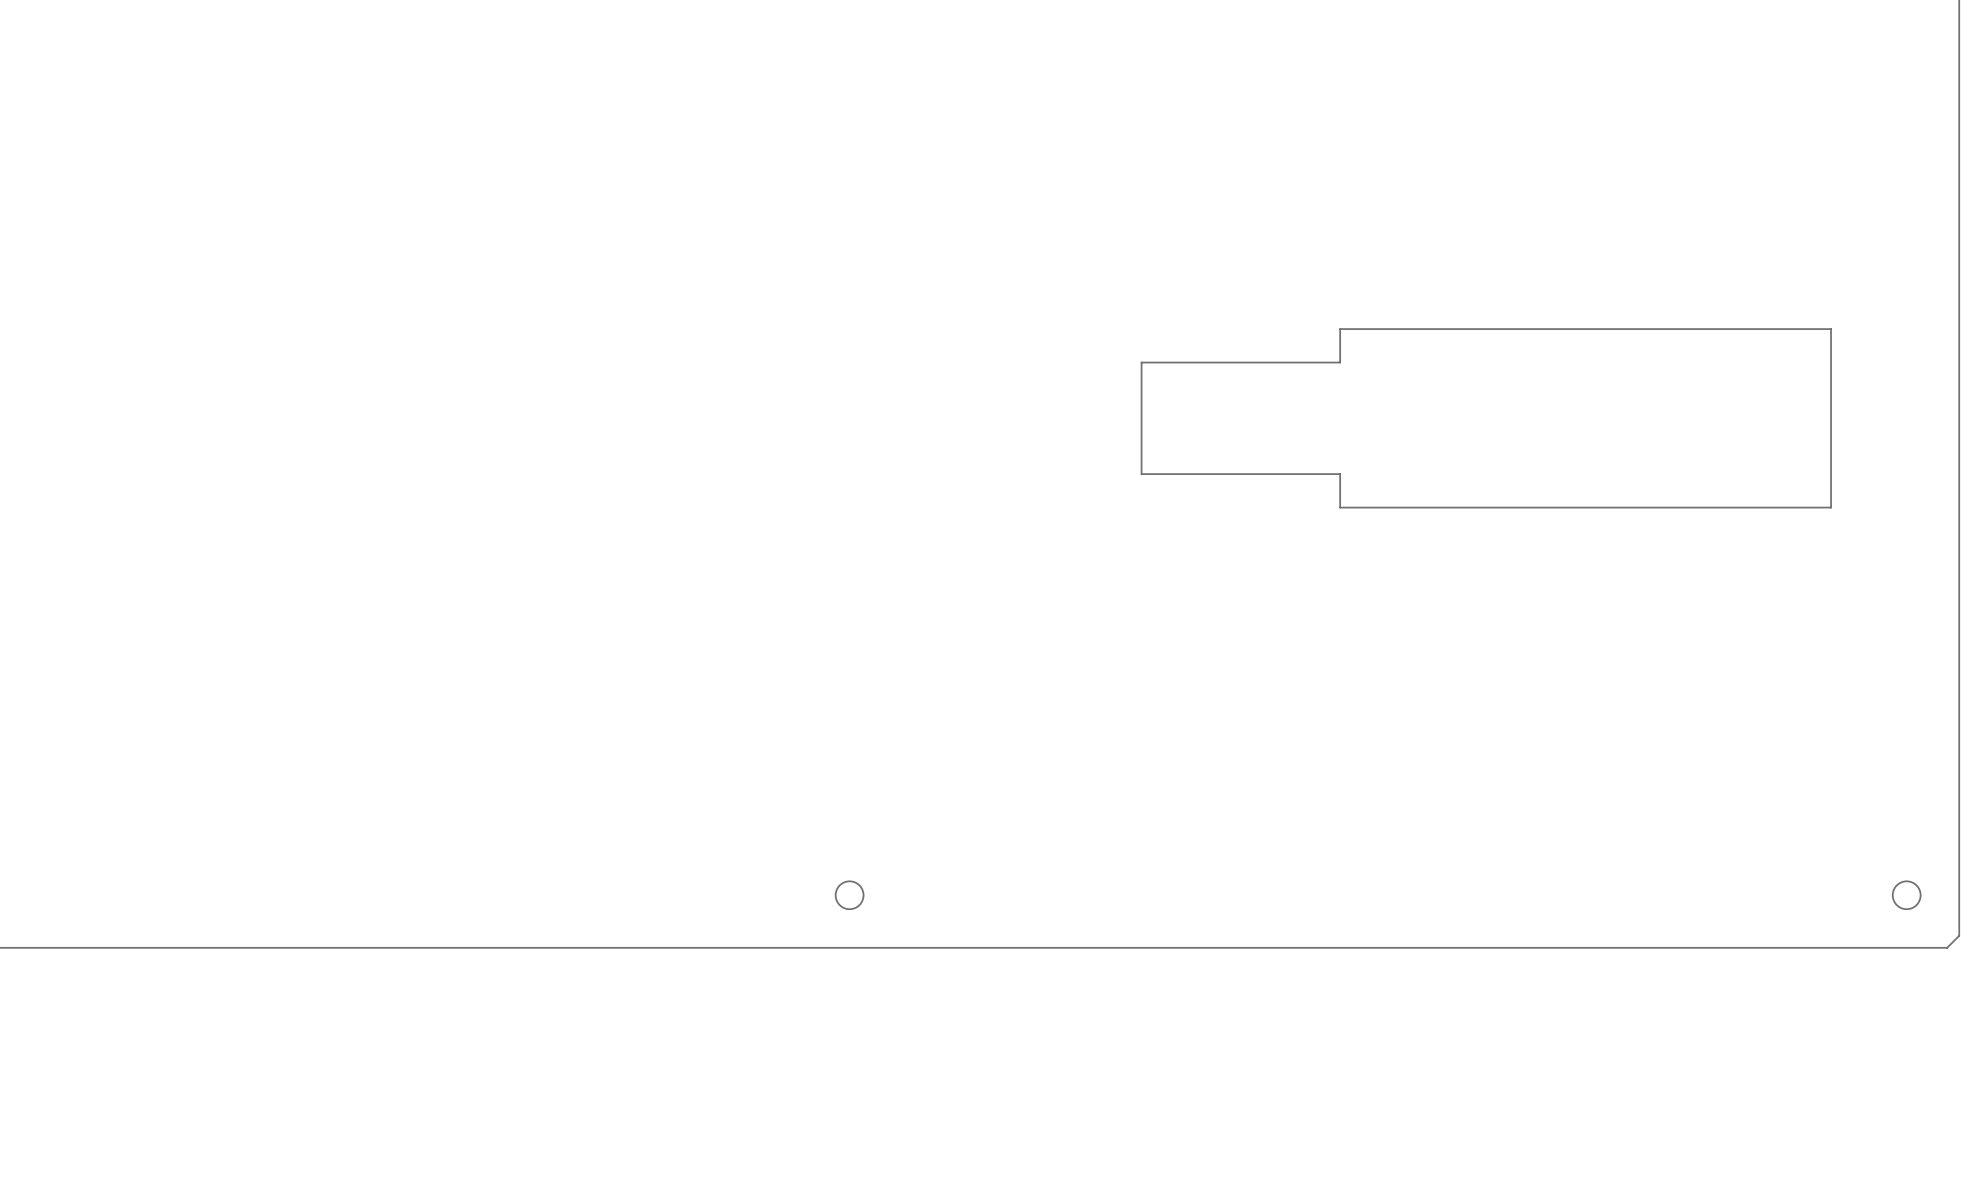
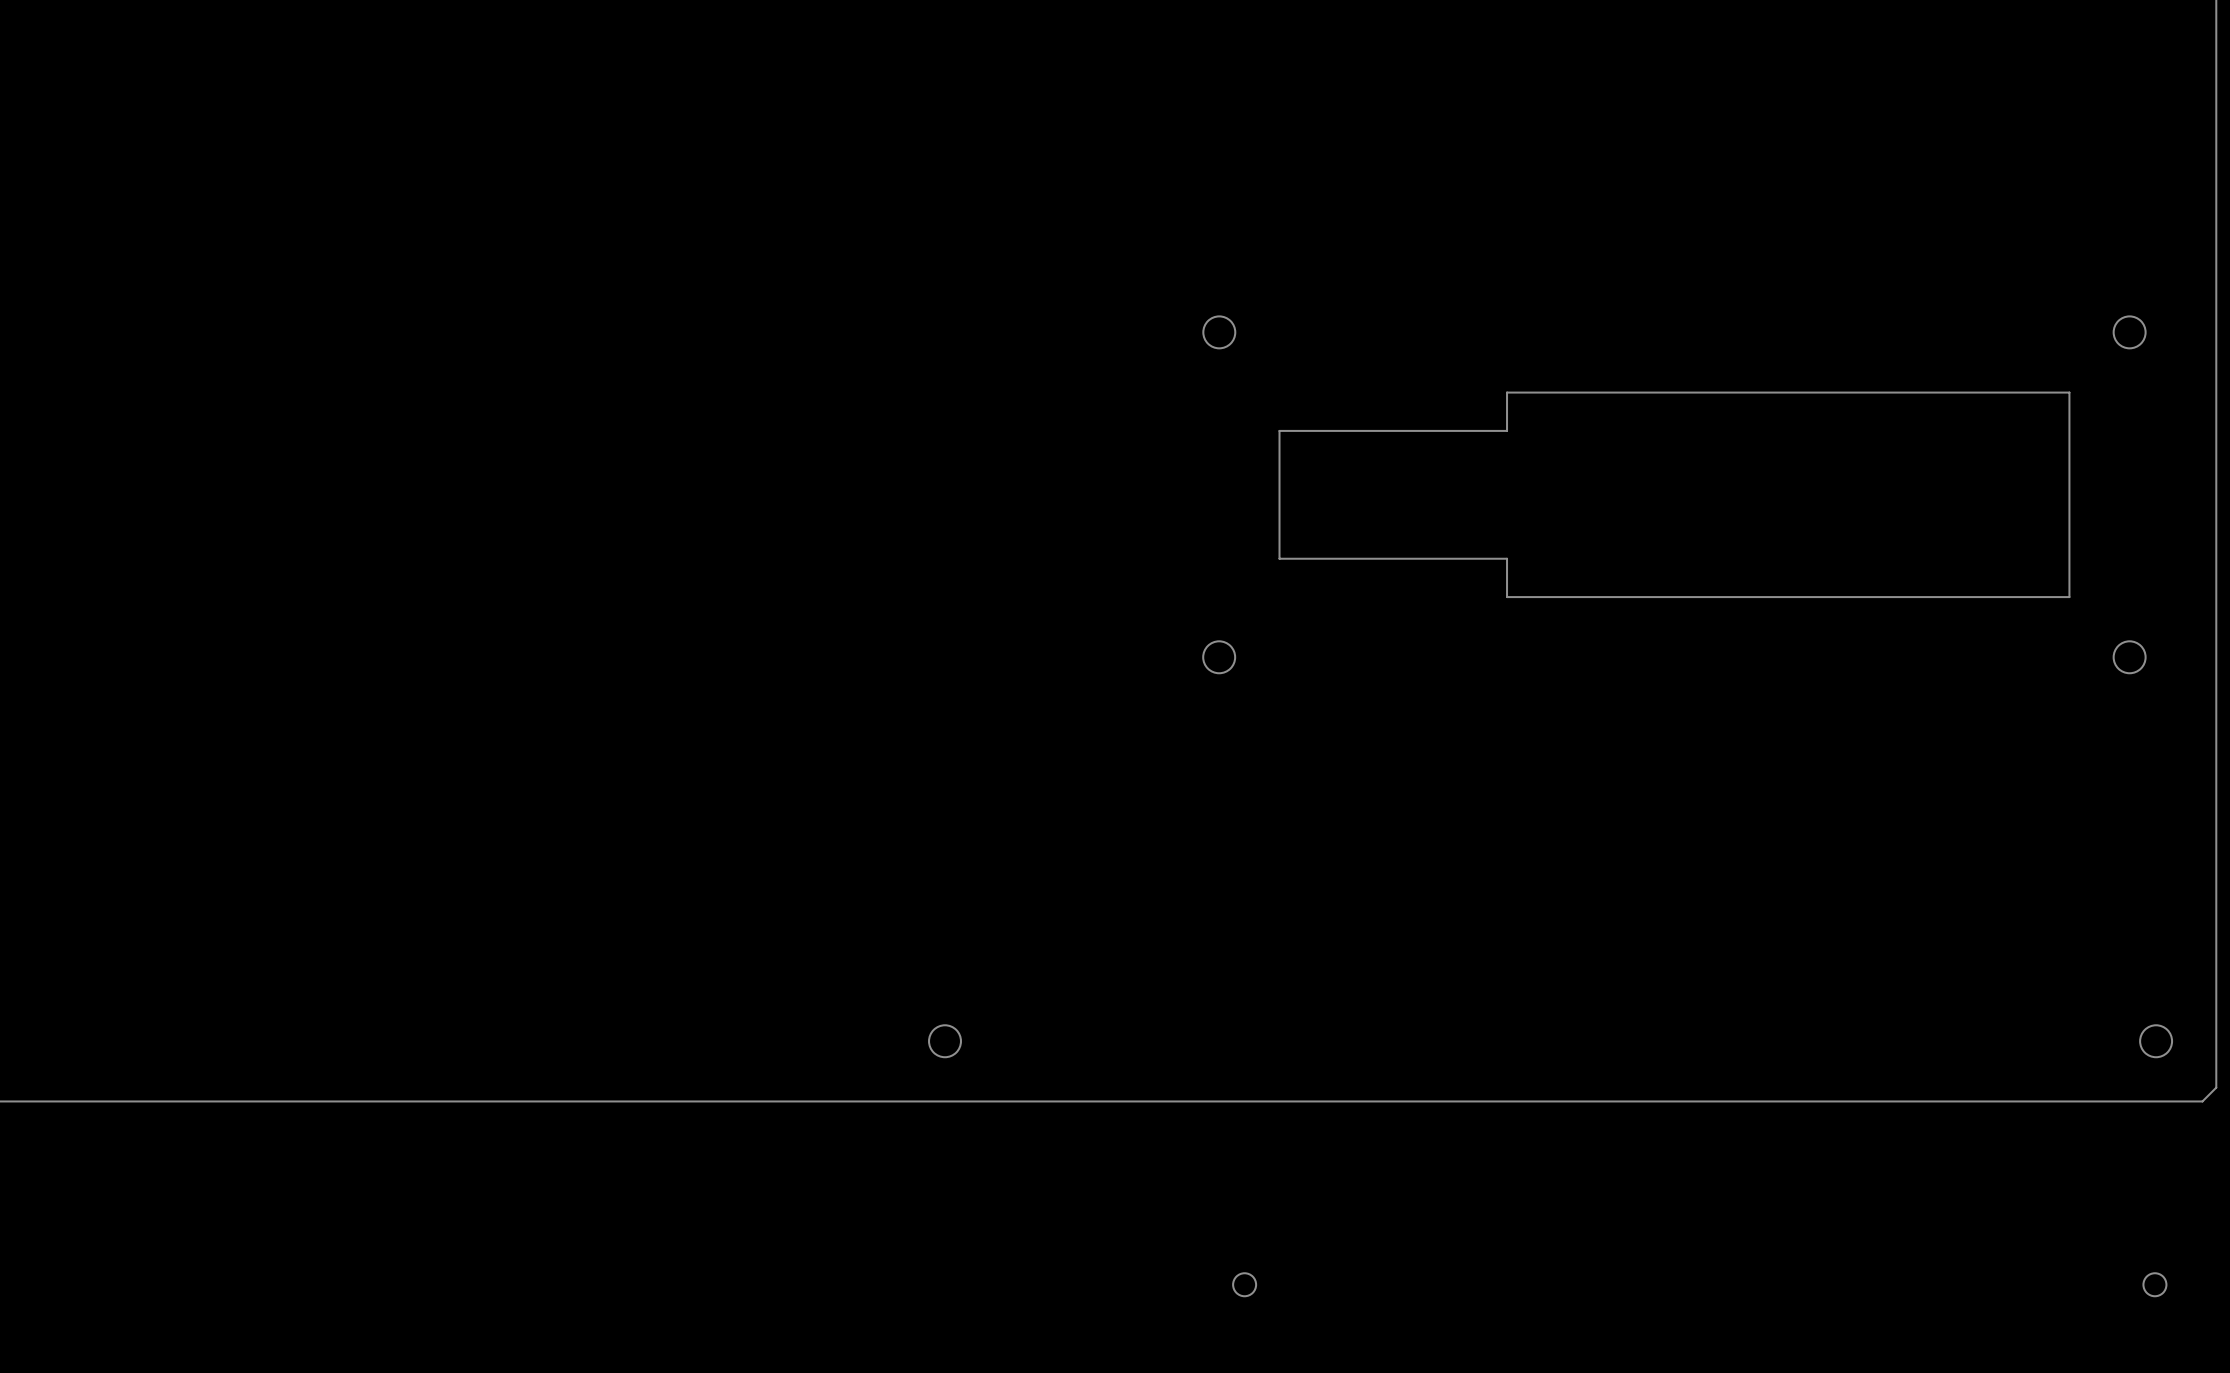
drawing: none -> [1202, 315, 1237, 350]
drawing: none -> [2112, 315, 2147, 350]
drawing: none -> [1202, 640, 1237, 675]
drawing: none -> [2112, 640, 2147, 675]
drawing: none -> [1232, 1272, 1258, 1298]
drawing: none -> [2142, 1272, 2168, 1298]

